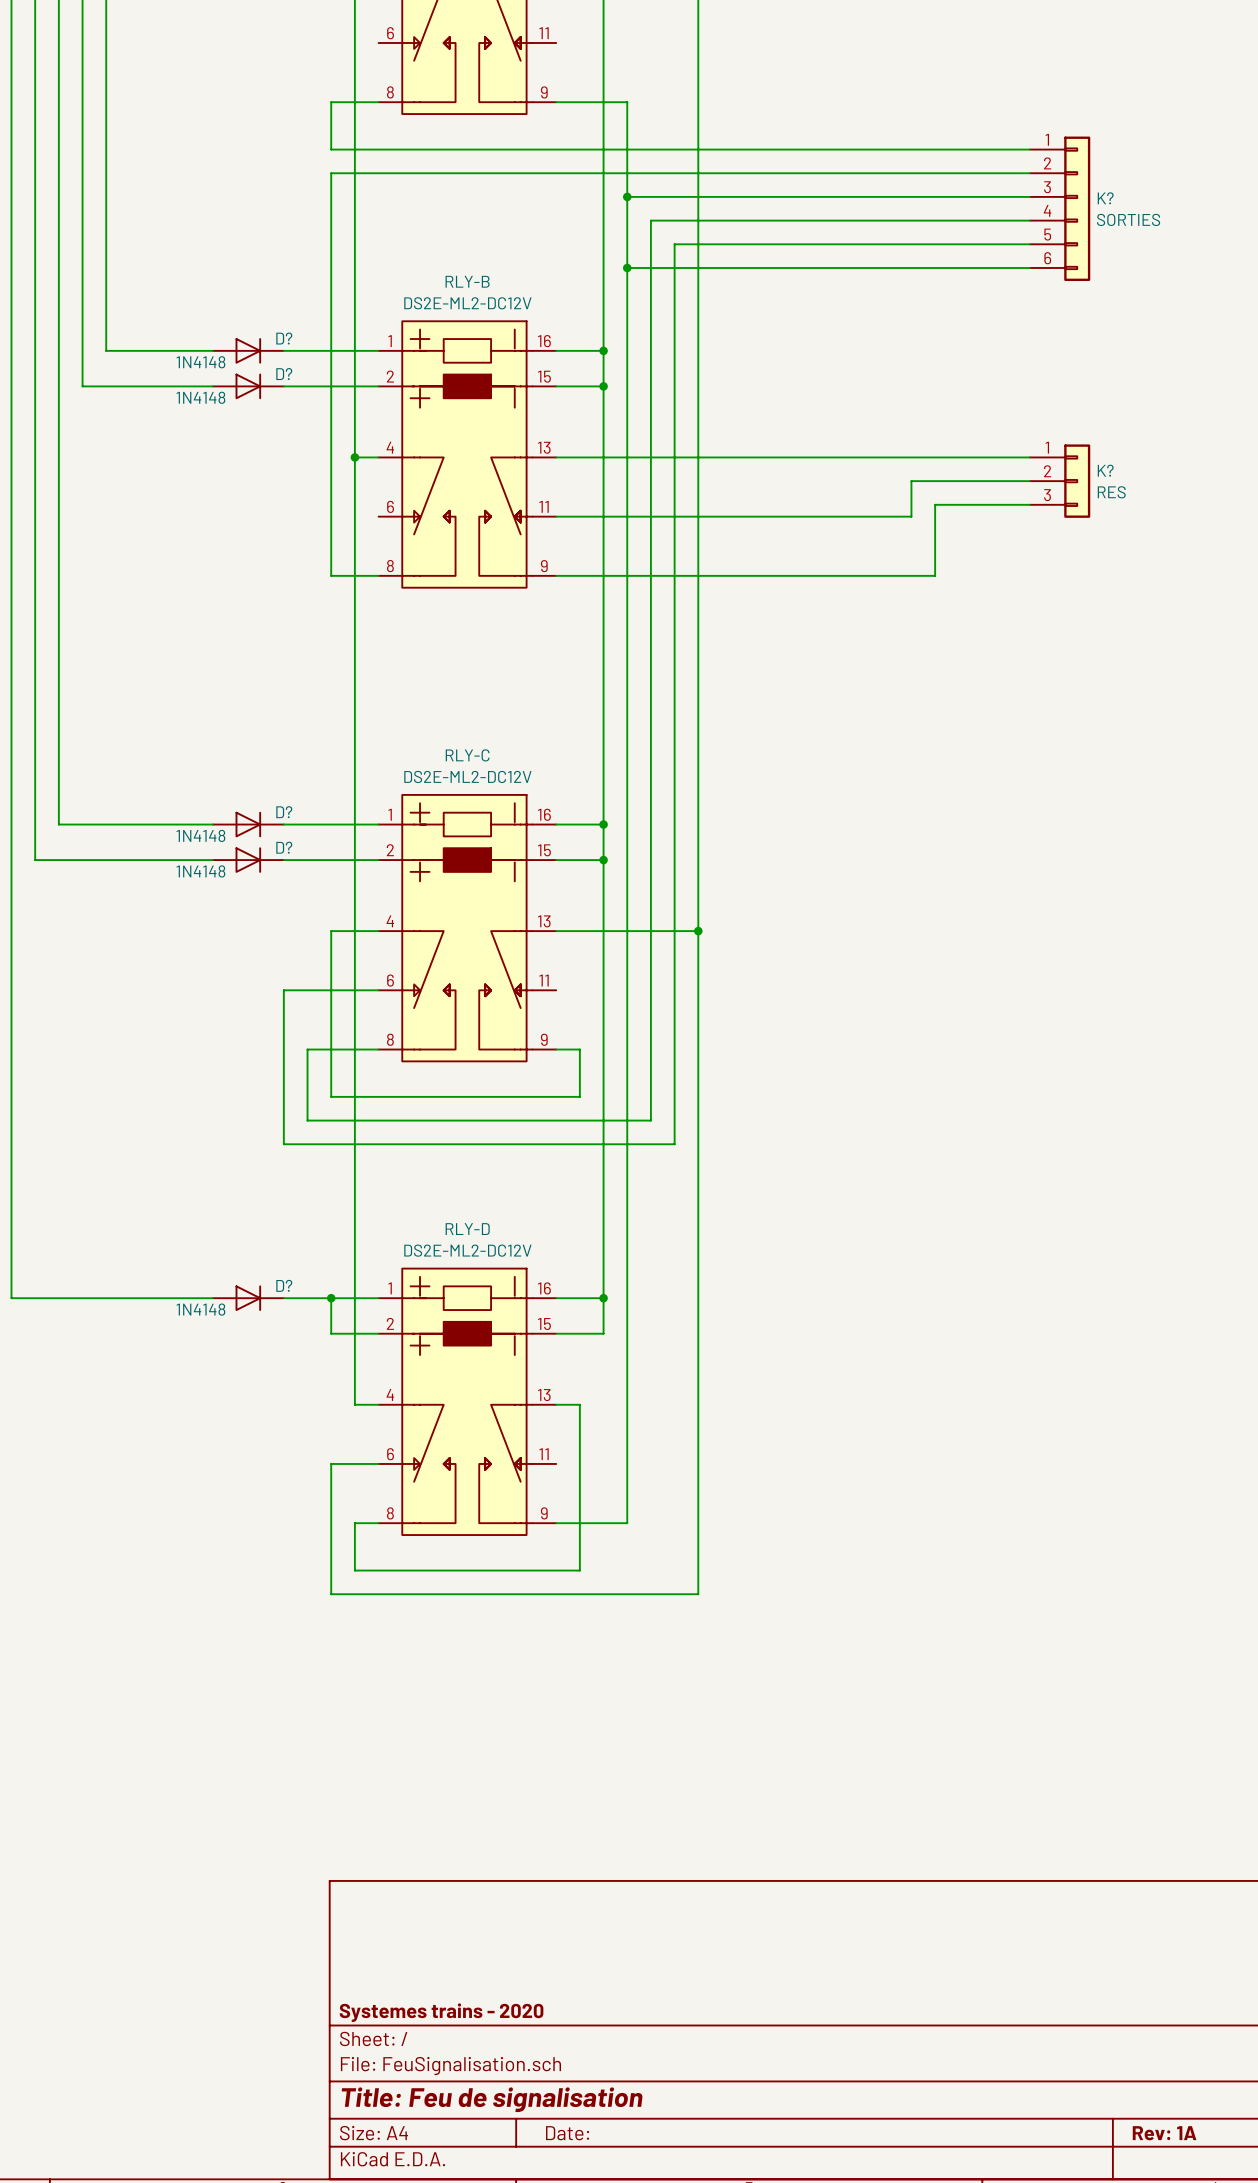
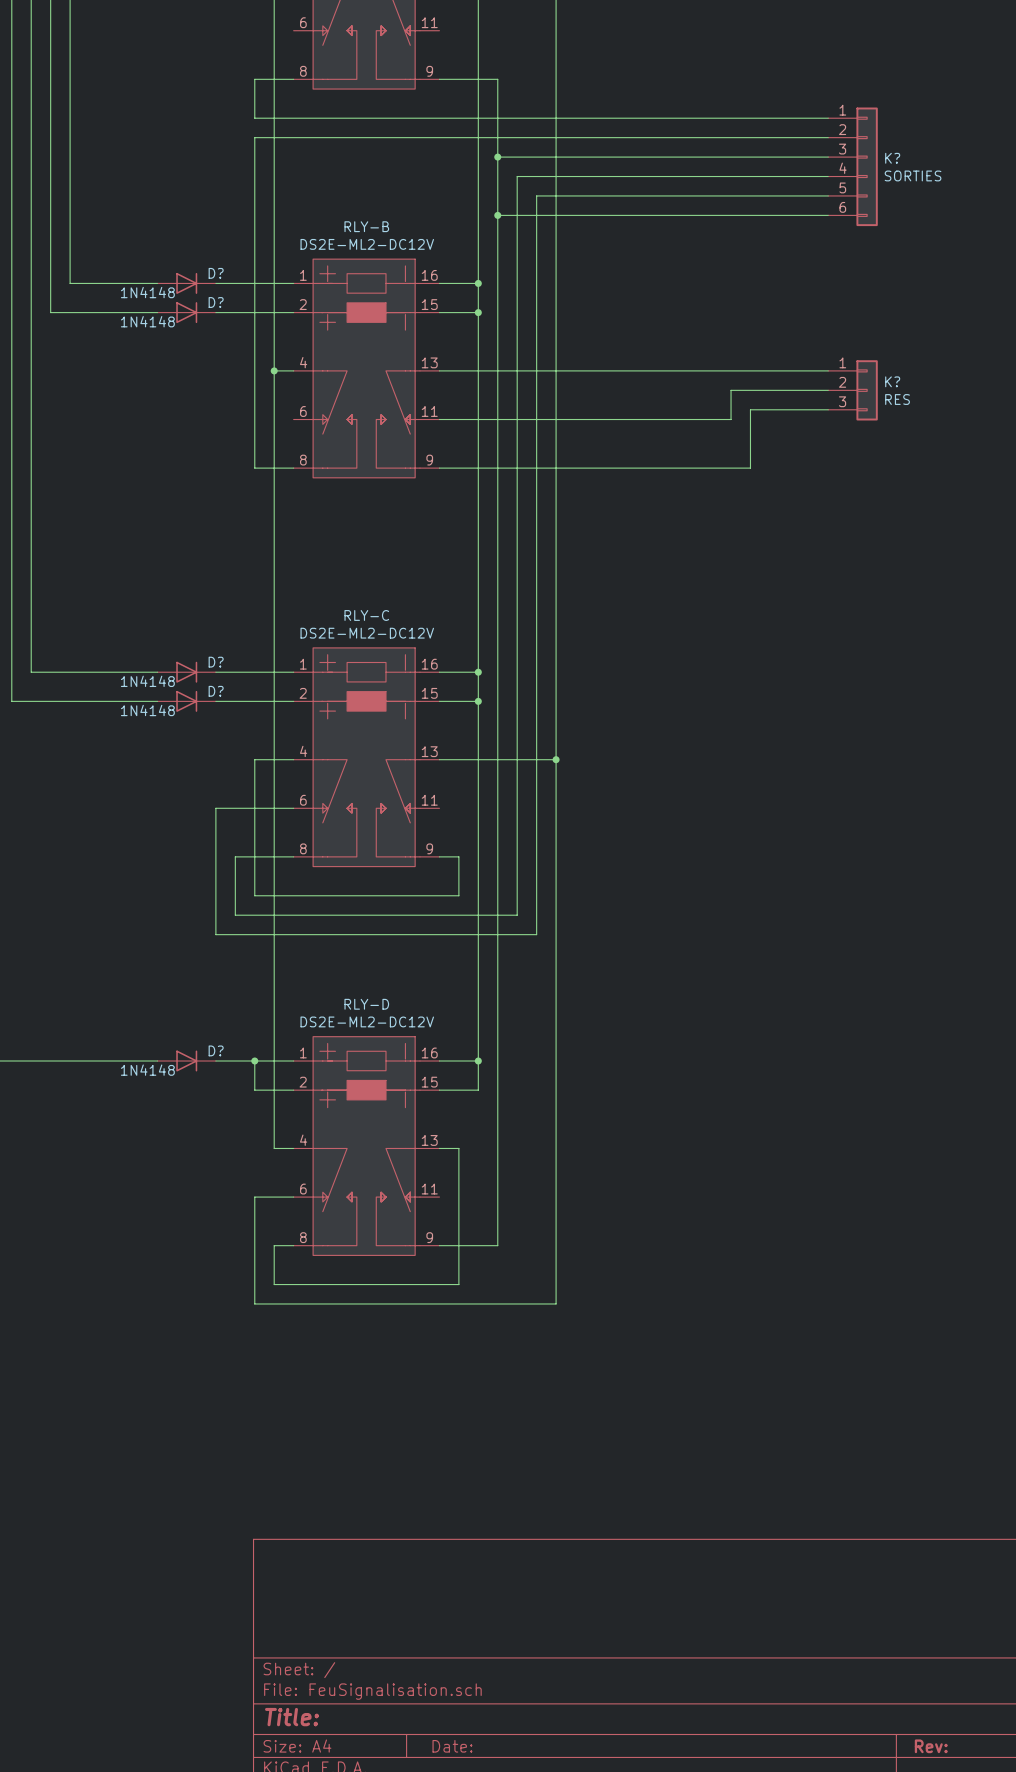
title block: Systemes trains - 2020 (441, 2012) -> none
title block: Title: Feu de signalisation (492, 2099) -> Title: (292, 1717)
title block: Rev: 1A (1164, 2133) -> Rev: (931, 1746)

